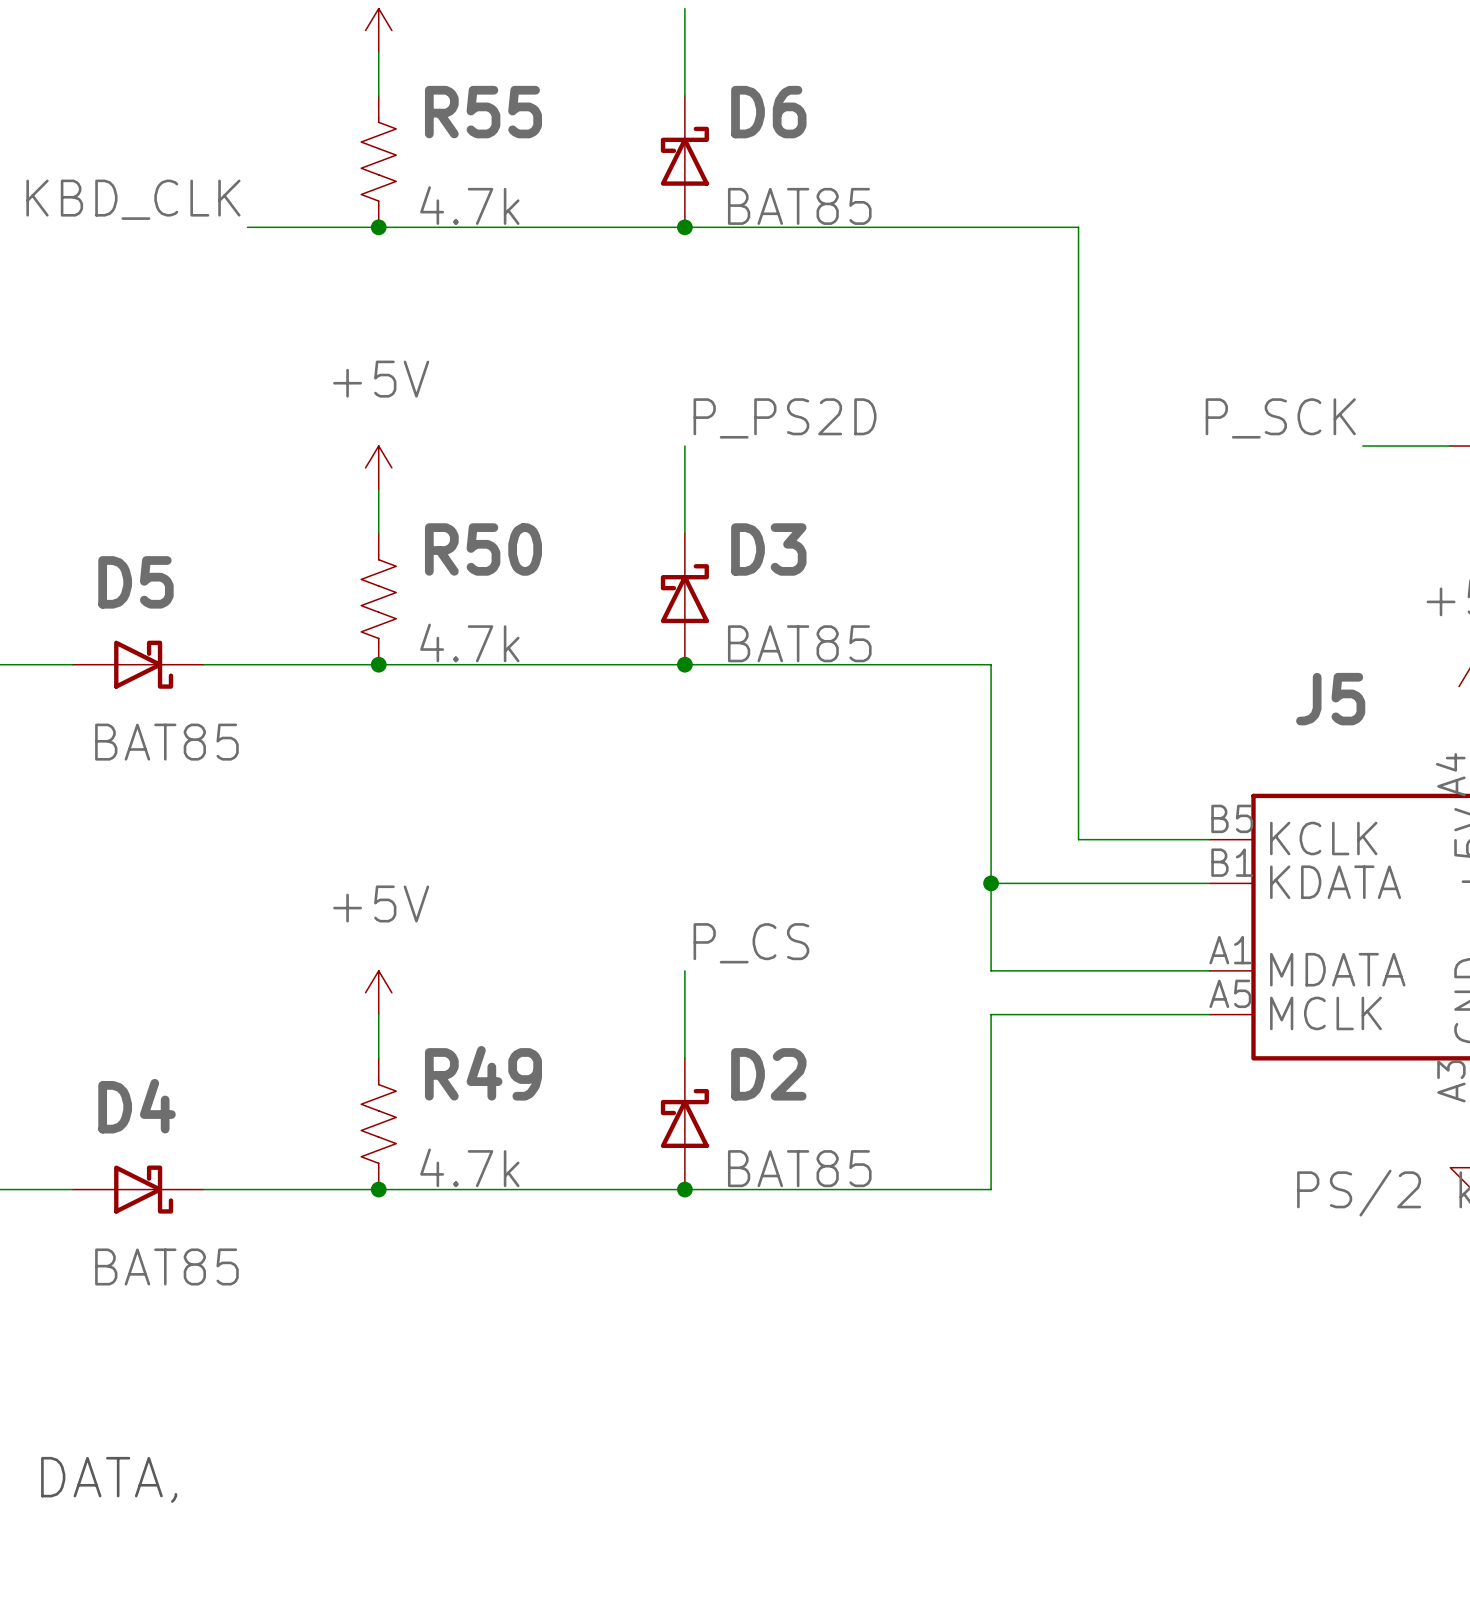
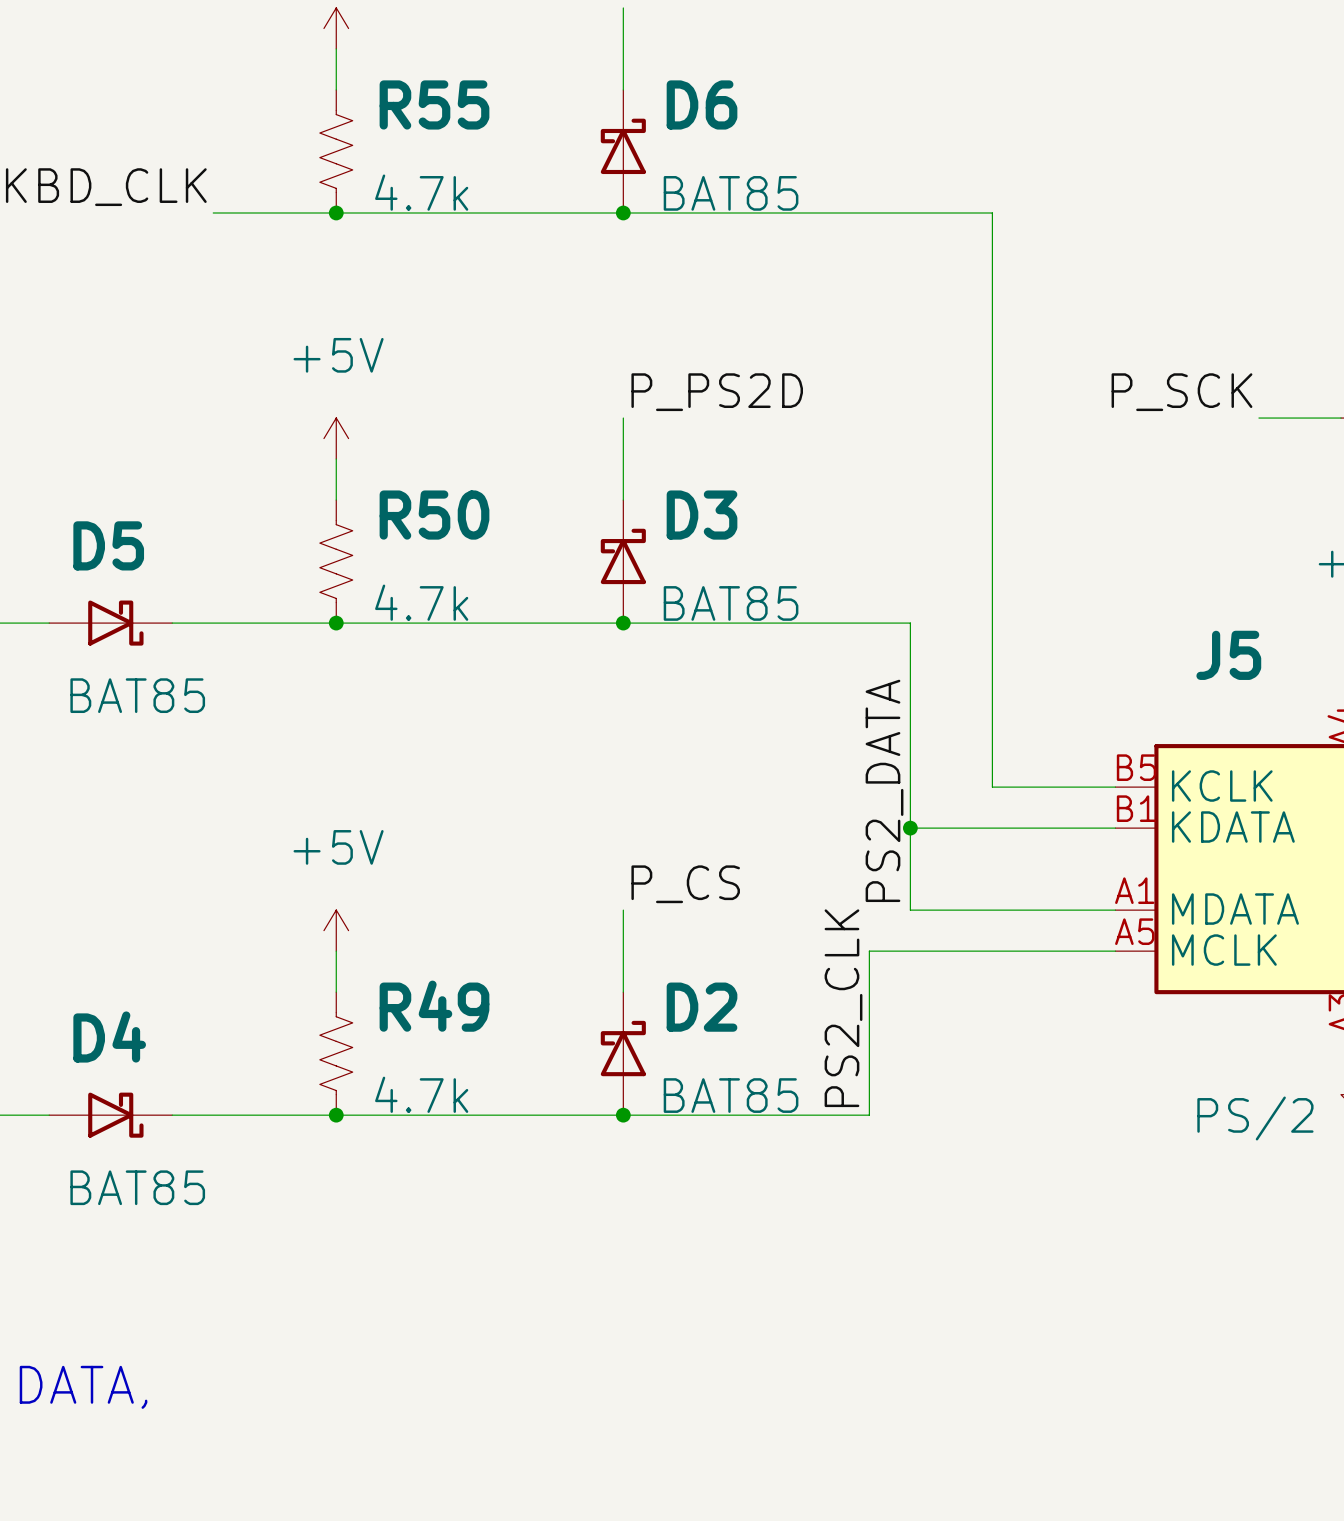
label: none -> PS2_DATA (884, 790)
wire: (991, 1014) (991, 1189) (947, 1189) -> (910, 951) (869, 951) (869, 1115)
label: none -> PS2_CLK (843, 1008)

